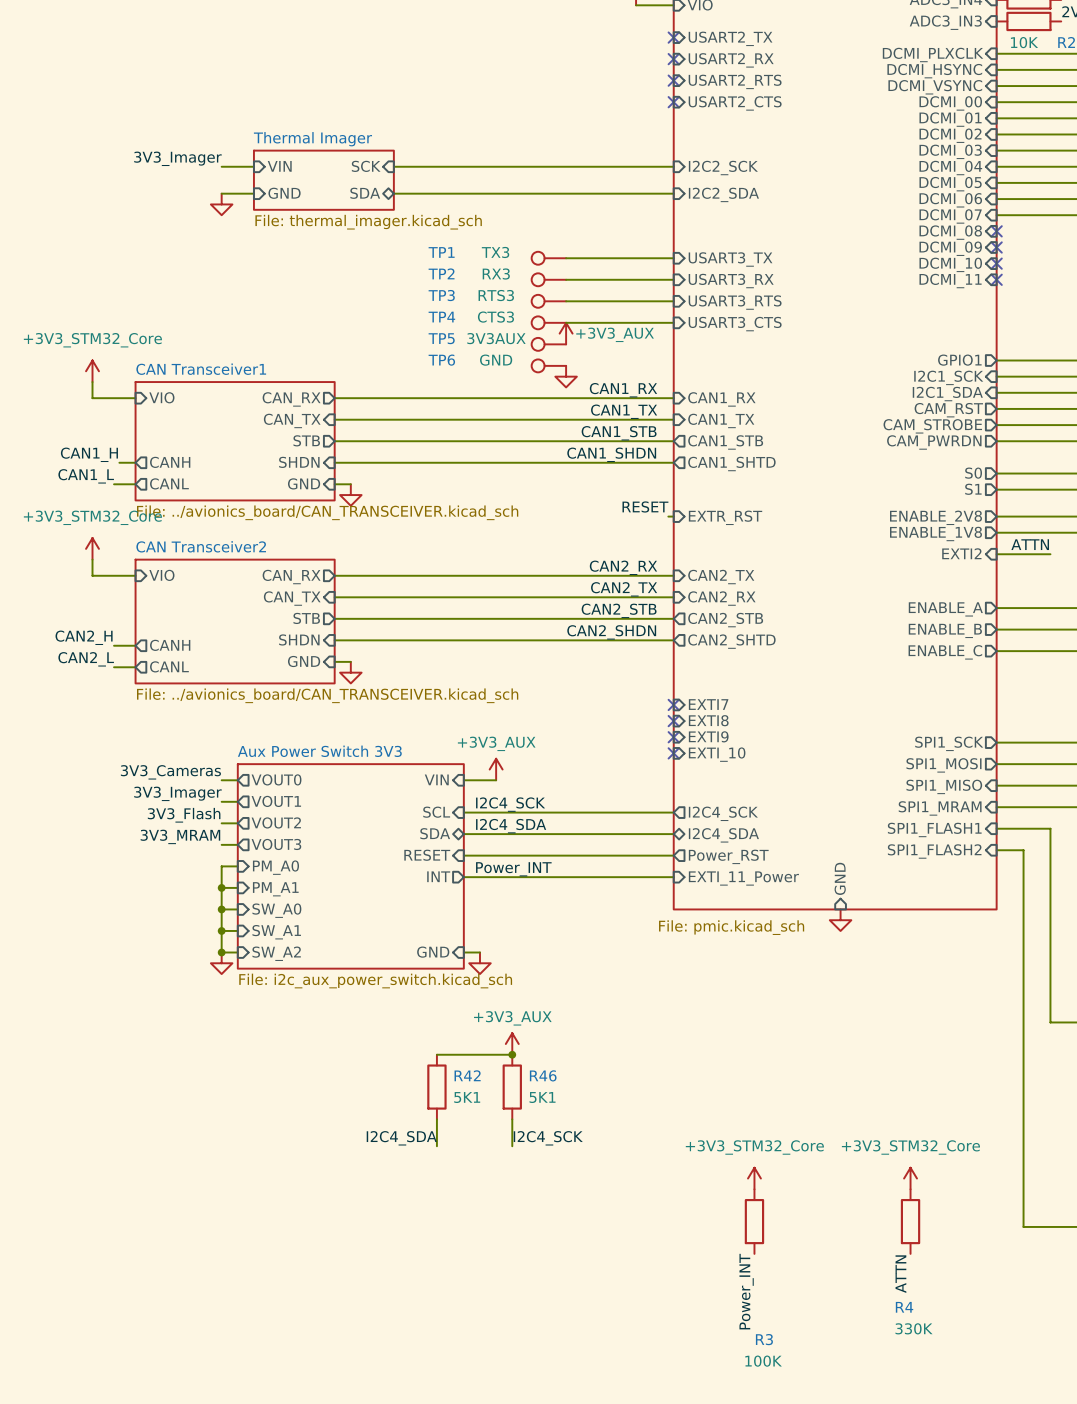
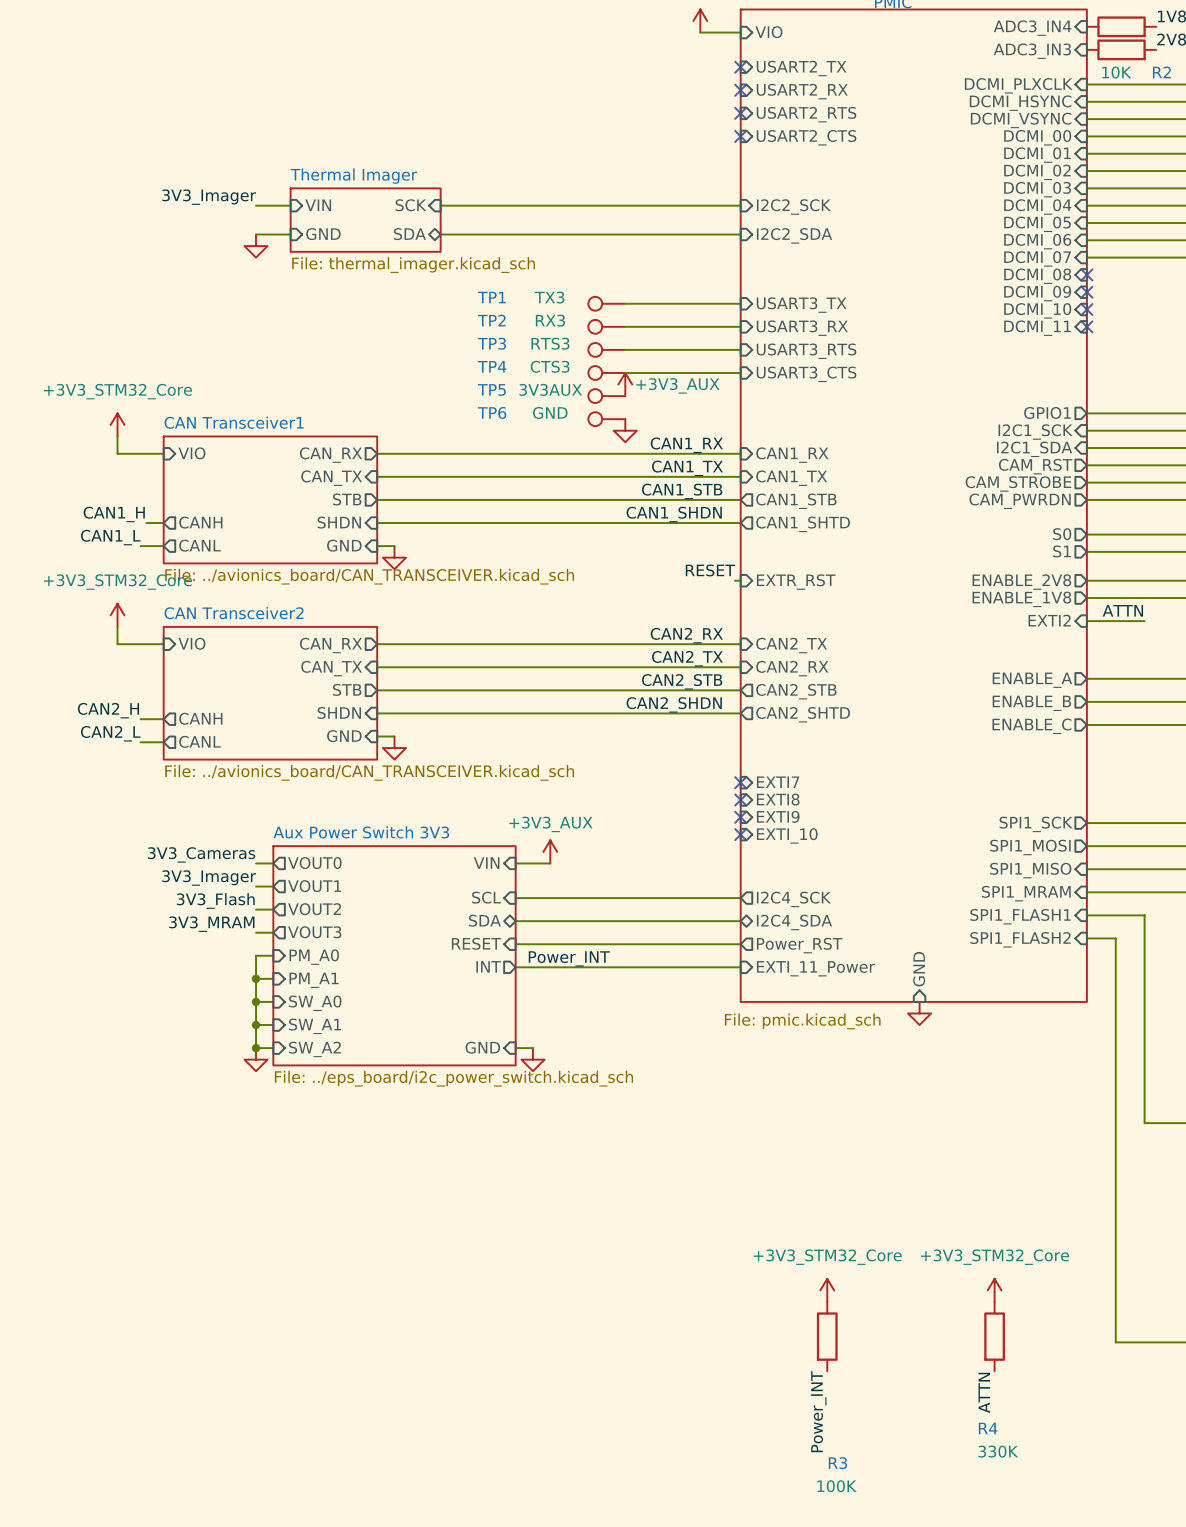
label: I2C4_SCK (510, 804) -> none
label: I2C4_SDA (511, 826) -> none
sheet Aux Power Switch 3V3 value: File: i2c_aux_power_switch.kicad_sch (375, 981) -> File: ../eps_board/i2c_power_switch.kicad_sch (453, 1078)
power symbol: +3V3_AUX (512, 1043) -> none
wire: (436, 1054) (512, 1054) -> none
junction: (512, 1054) -> none
R42: 5K1 (436, 1087) -> none
R46: 5K1 (512, 1087) -> none
wire: (436, 1119) (436, 1146) -> none
wire: (512, 1119) (512, 1146) -> none
label: I2C4_SDA (401, 1138) -> none
label: I2C4_SCK (548, 1138) -> none

